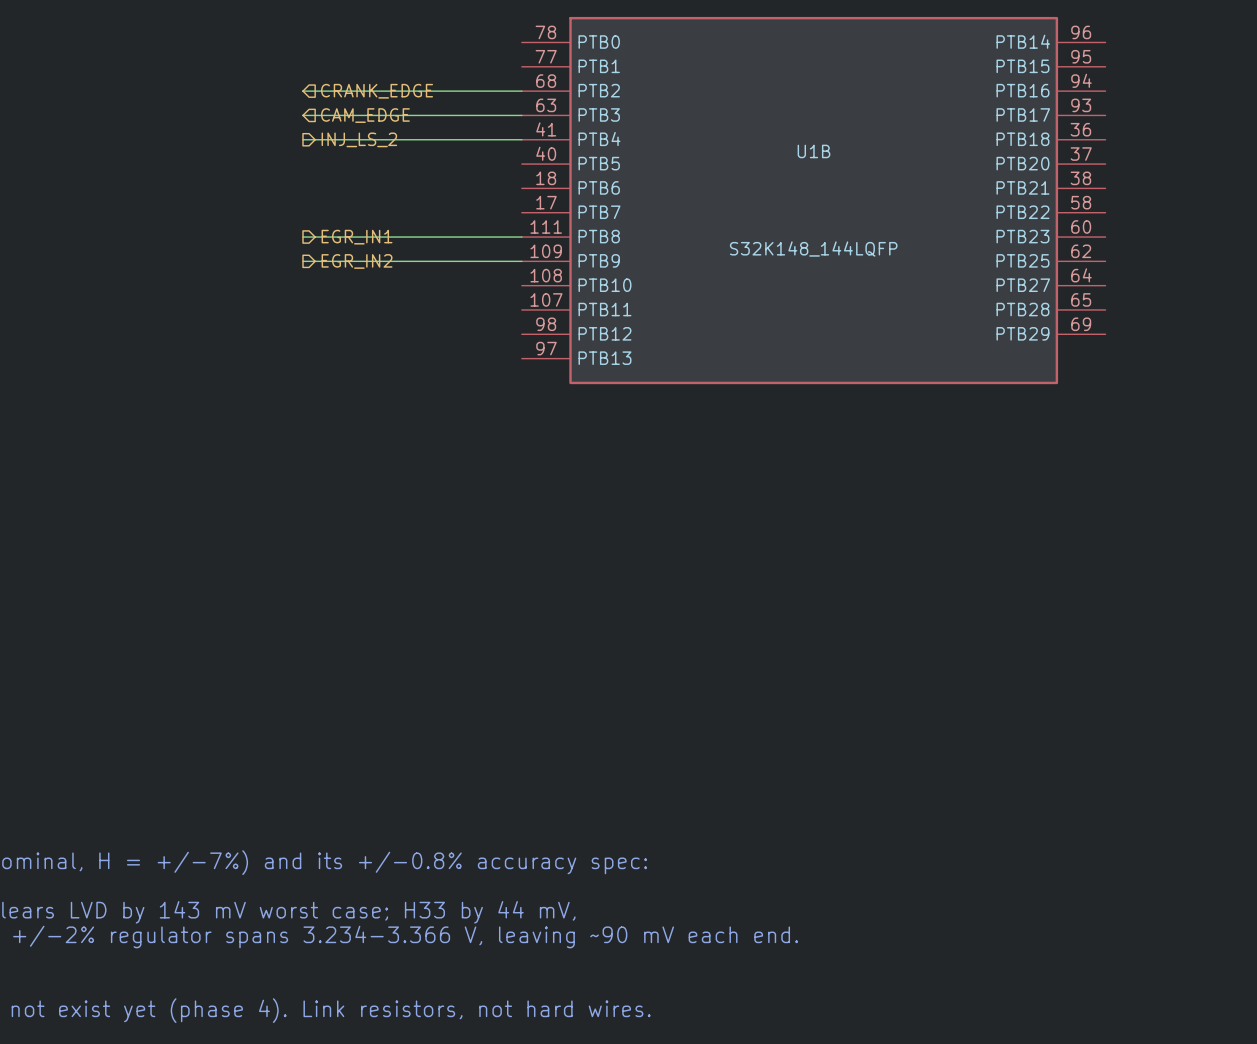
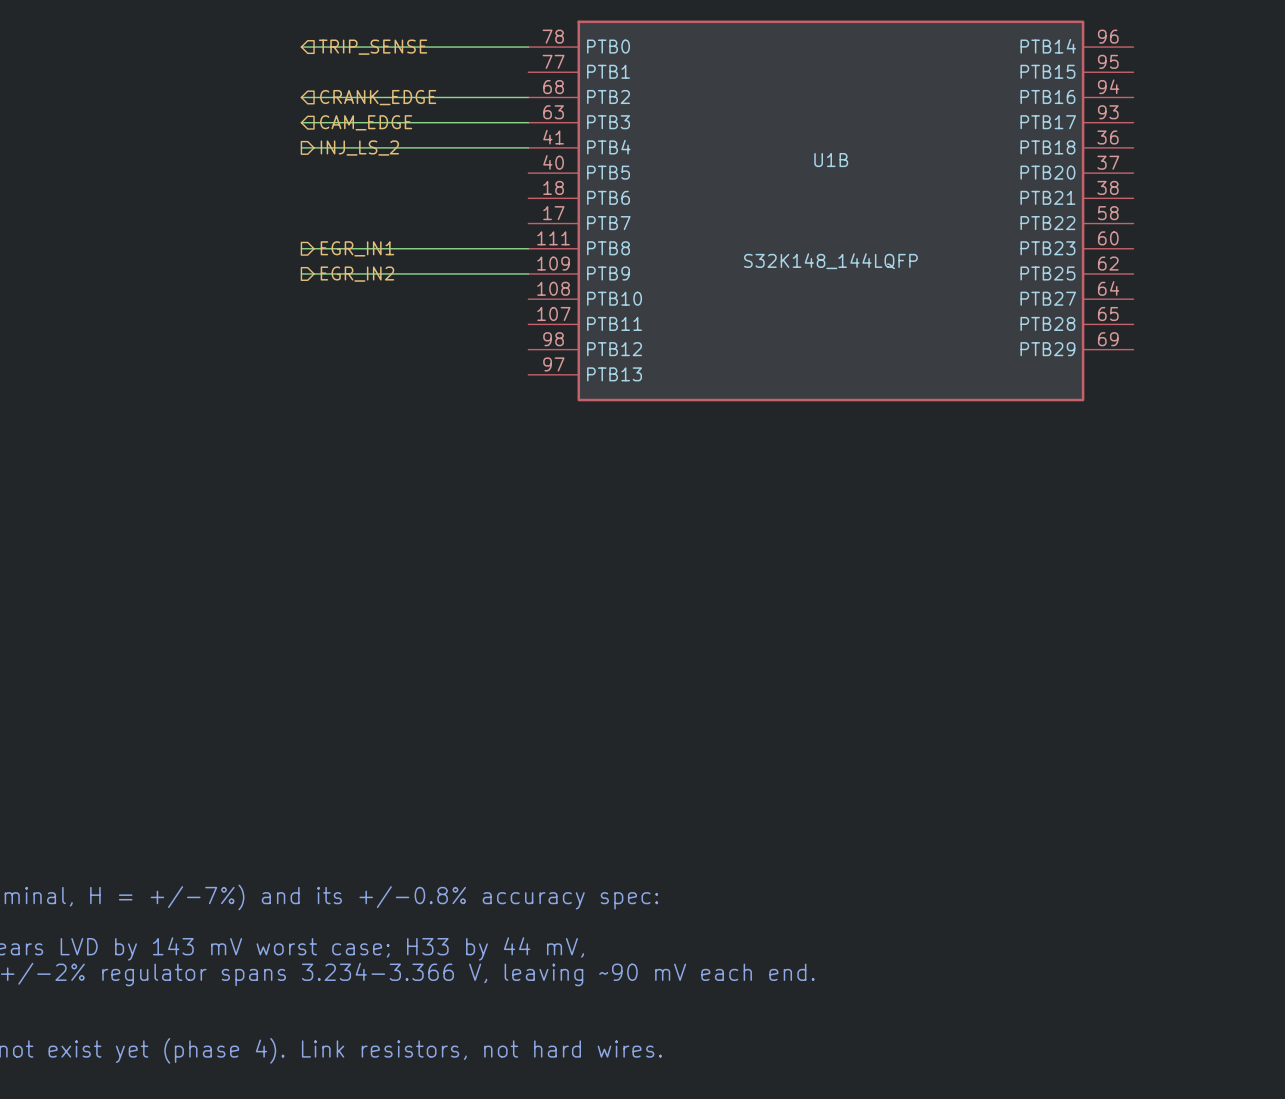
wire: none -> (301, 47) (528, 47)
hierarchical label: none -> TRIP_SENSE (373, 47)

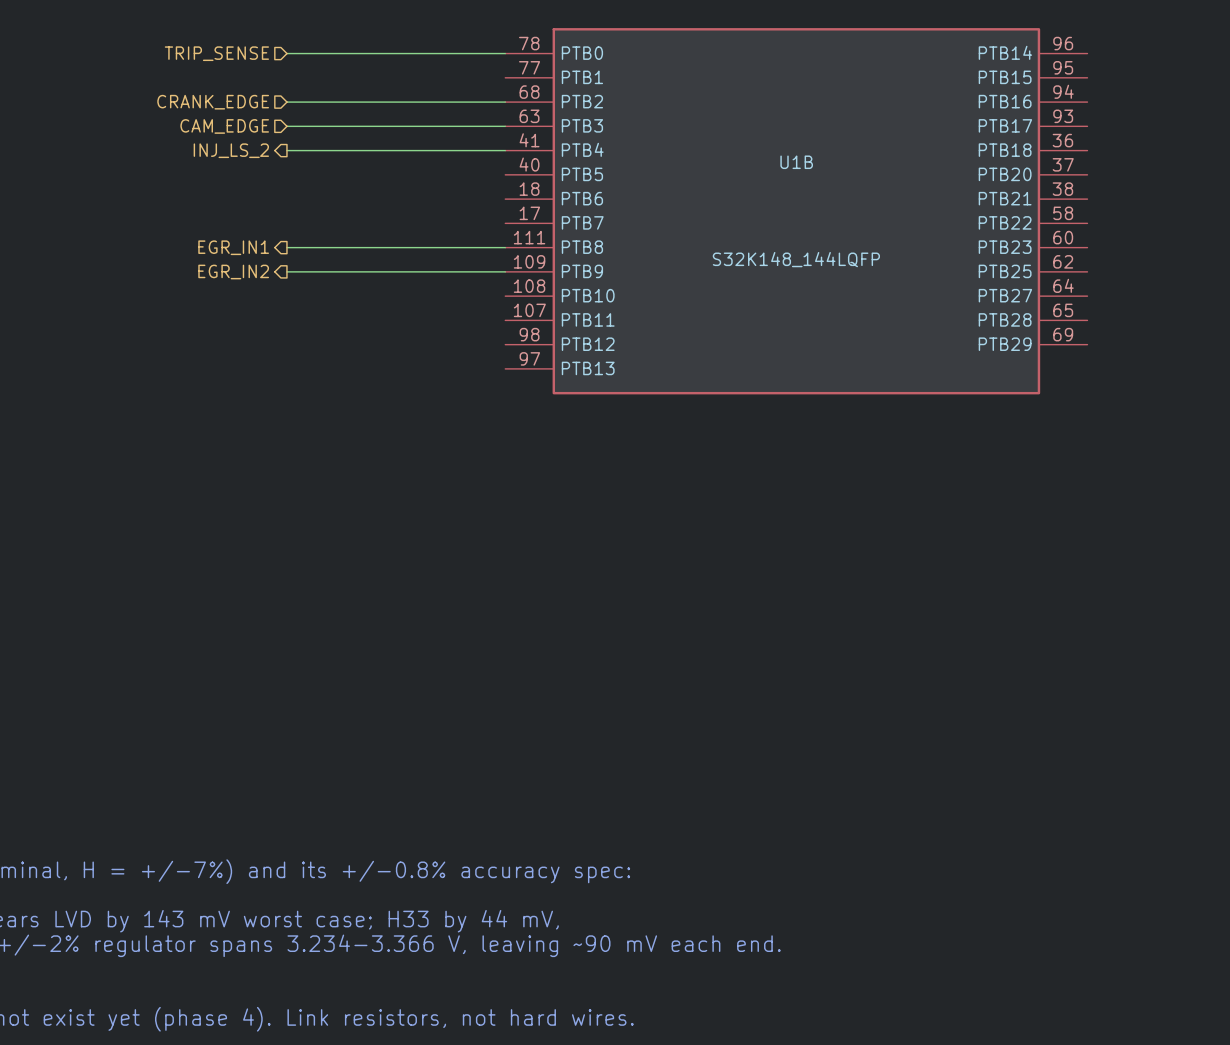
hierarchical label rotation: 0° (373, 47) -> 180° (216, 53)
hierarchical label position: TRIP_SENSE (373, 47) -> TRIP_SENSE (216, 53)
hierarchical label rotation: 0° (378, 97) -> 180° (213, 102)
hierarchical label position: CRANK_EDGE (378, 97) -> CRANK_EDGE (213, 102)
hierarchical label rotation: 0° (366, 122) -> 180° (224, 126)
hierarchical label position: CAM_EDGE (366, 122) -> CAM_EDGE (224, 126)
hierarchical label rotation: 0° (359, 148) -> 180° (231, 150)
hierarchical label position: INJ_LS_2 (359, 148) -> INJ_LS_2 (231, 150)
hierarchical label rotation: 0° (357, 248) -> 180° (233, 247)
hierarchical label position: EGR_IN1 (357, 248) -> EGR_IN1 (233, 247)
hierarchical label rotation: 0° (357, 274) -> 180° (233, 272)
hierarchical label position: EGR_IN2 (357, 274) -> EGR_IN2 (233, 272)

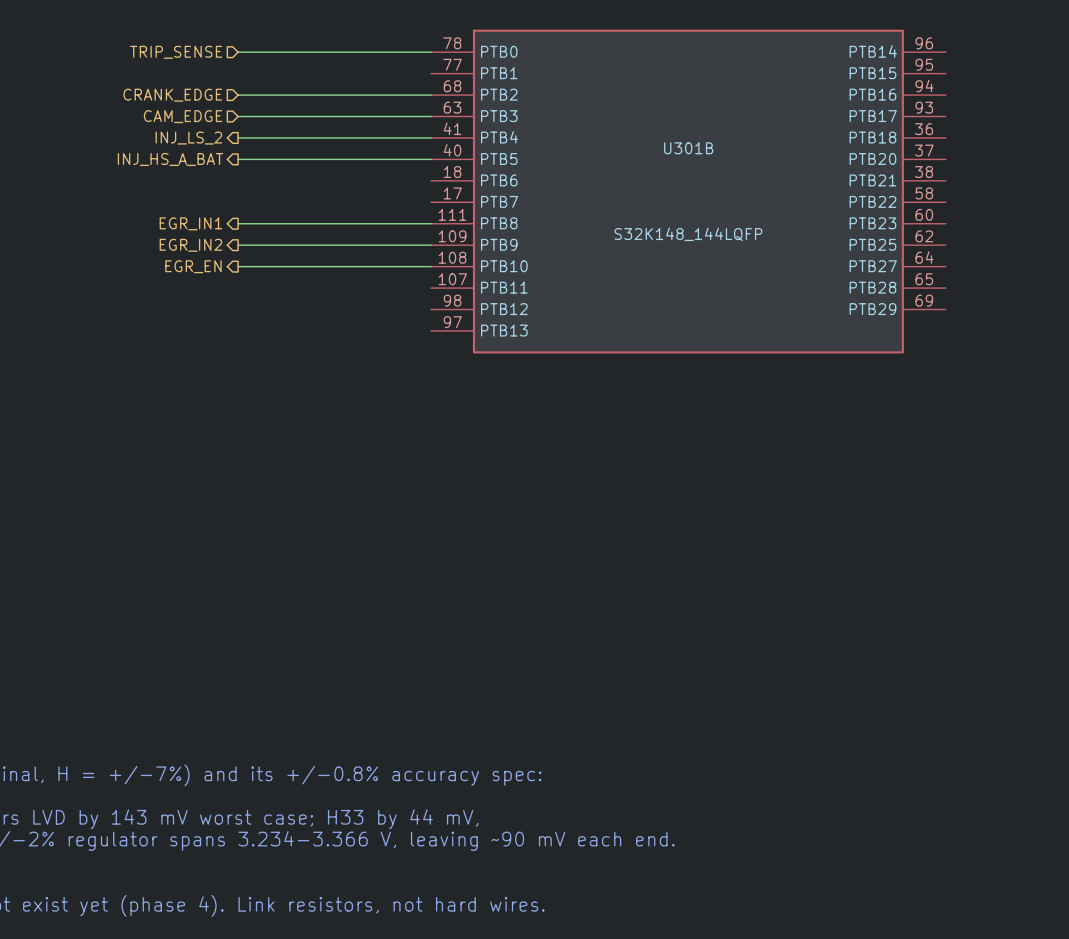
U1B name: U1B (796, 162) -> U301B (688, 148)
hierarchical label: none -> INJ_HS_A_BAT (170, 159)
wire: none -> (238, 159) (431, 159)
hierarchical label: none -> EGR_EN (193, 266)
wire: none -> (238, 266) (431, 266)

